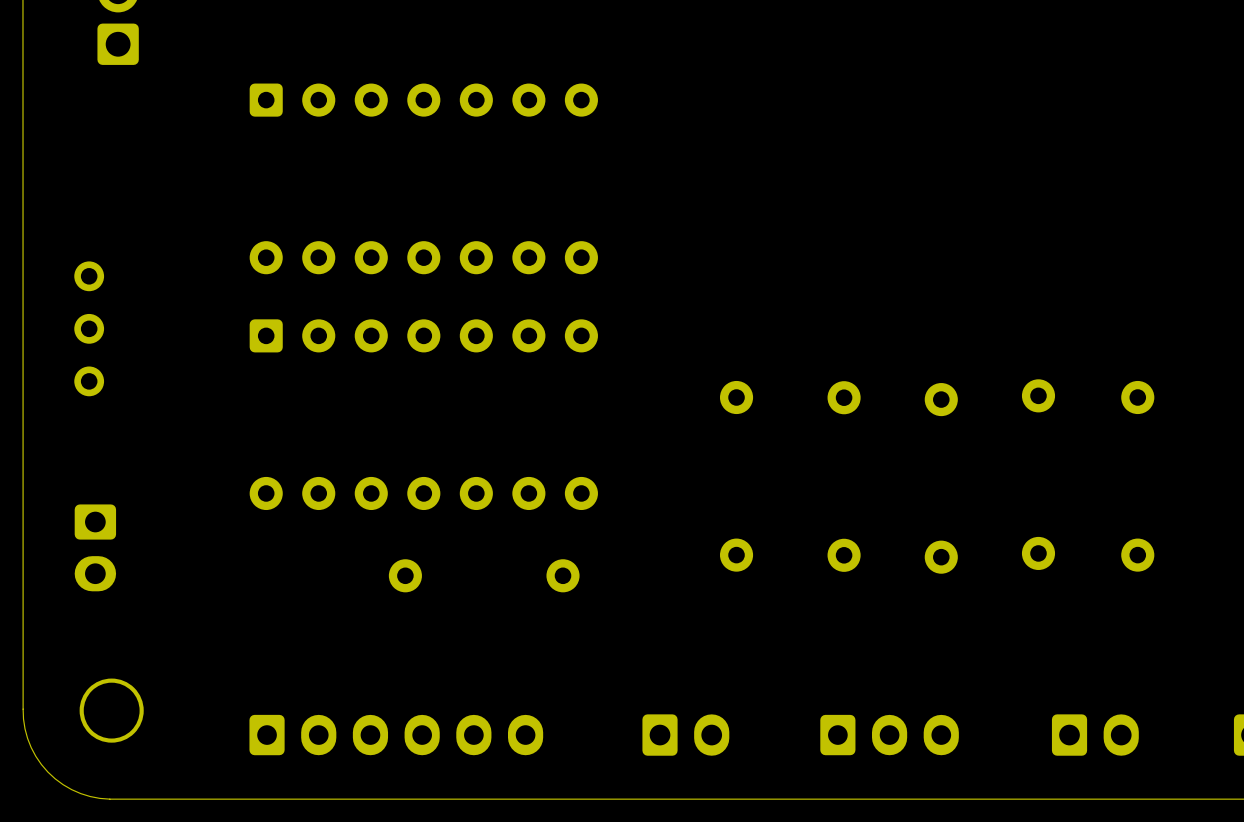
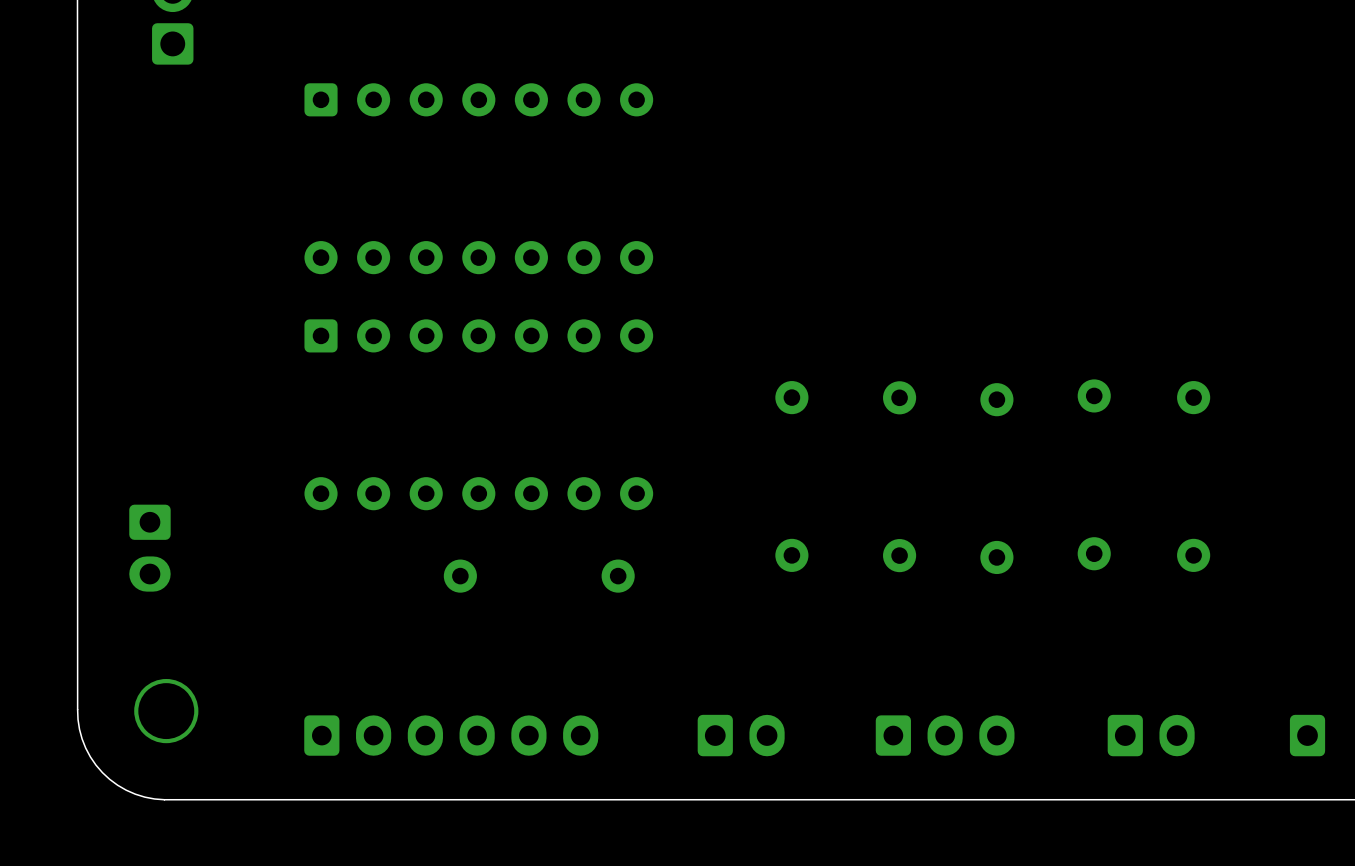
part: (89, 328) -> none

